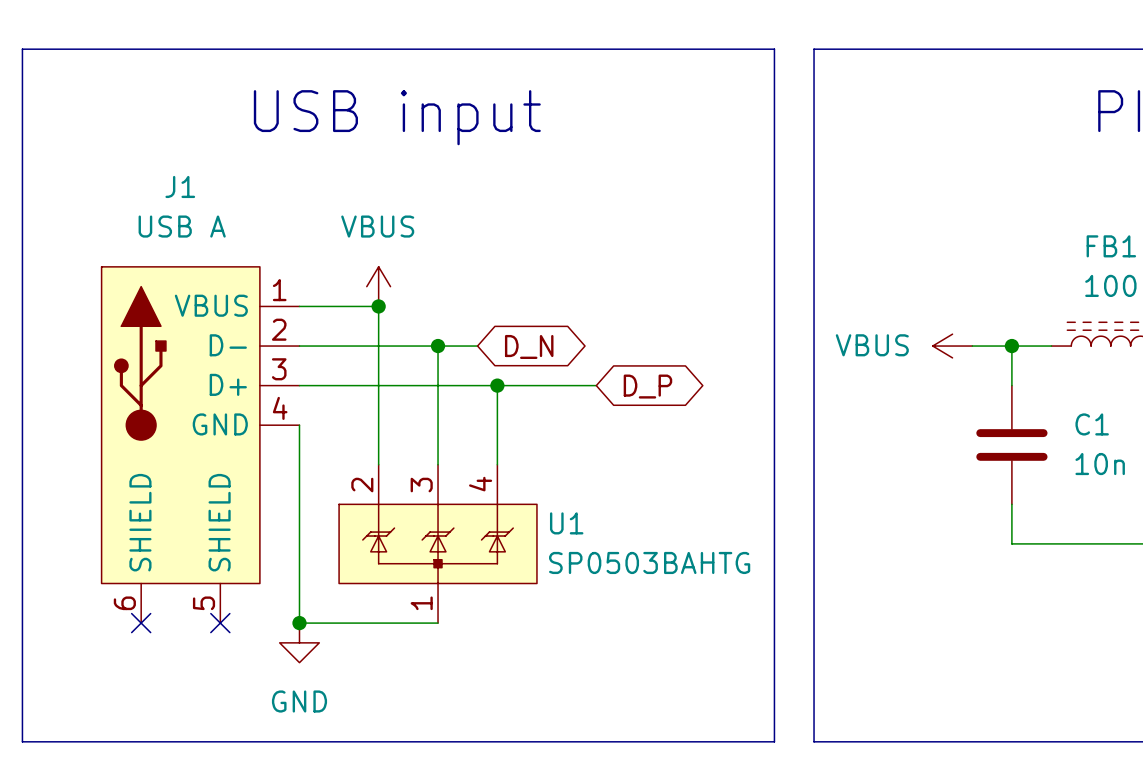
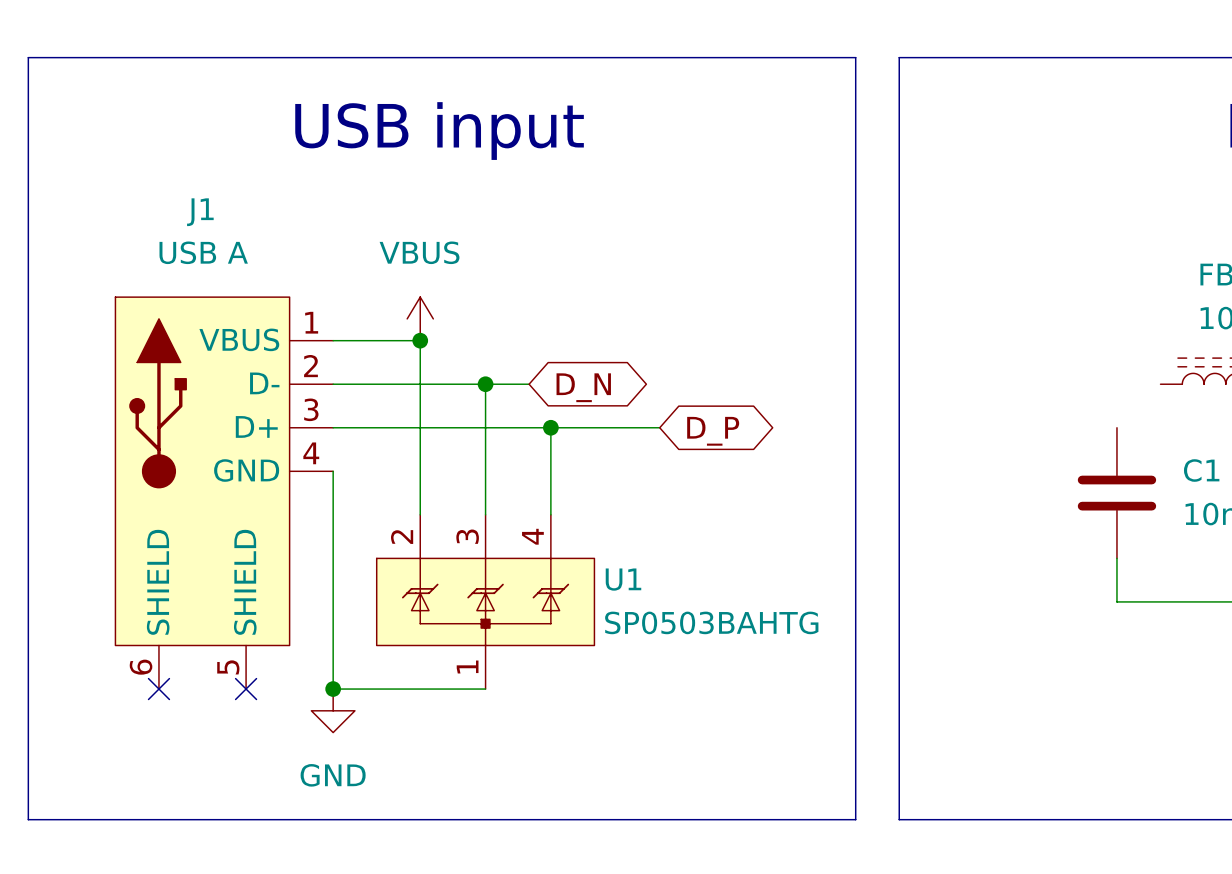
power symbol: VBUS (952, 346) -> none
wire: (972, 346) (1051, 346) -> none
wire: (1011, 346) (1011, 385) -> none
junction: (1011, 346) -> none

